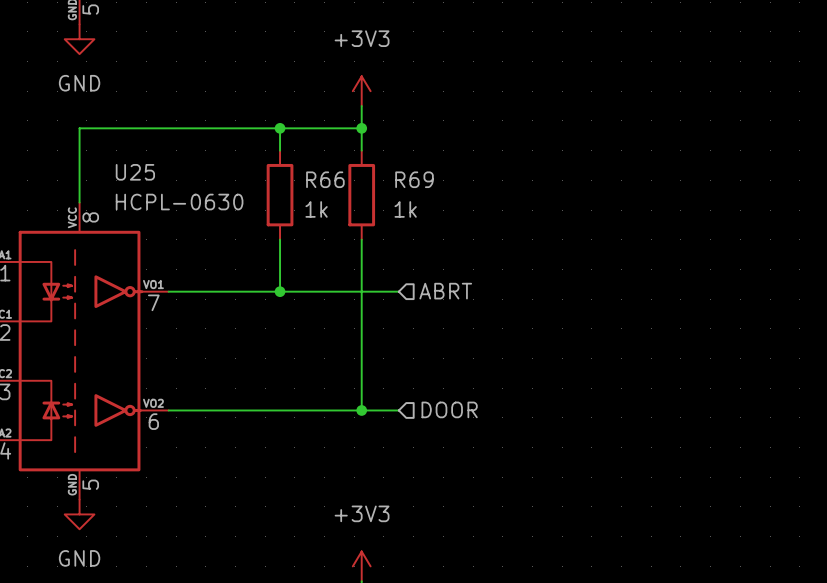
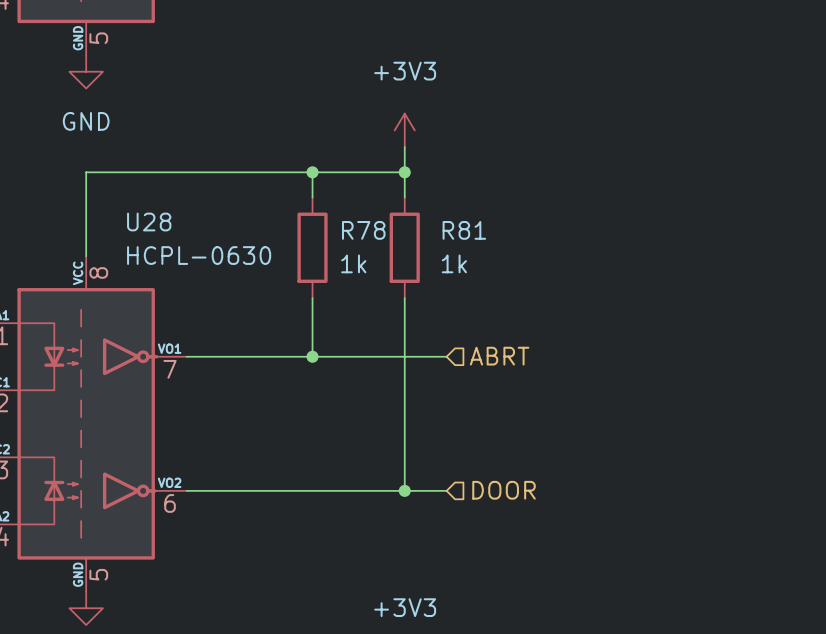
U25 name: U25 (135, 172) -> U28 (149, 222)
R66 name: R66 (325, 179) -> R78 (363, 230)
R69 name: R69 (414, 179) -> R81 (464, 230)

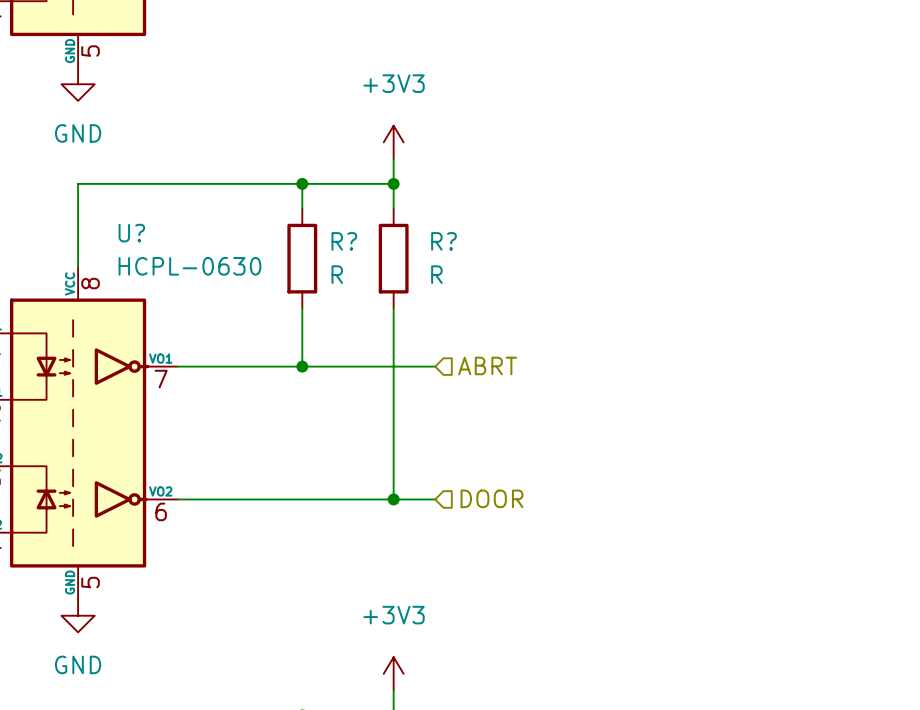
U28 name: U28 (149, 222) -> U? (131, 233)
R78 name: R78 (363, 230) -> R? (344, 241)
R81 name: R81 (464, 230) -> R? (444, 241)
R78 value: 1k (353, 263) -> R (337, 274)
R81 value: 1k (454, 263) -> R (436, 274)

